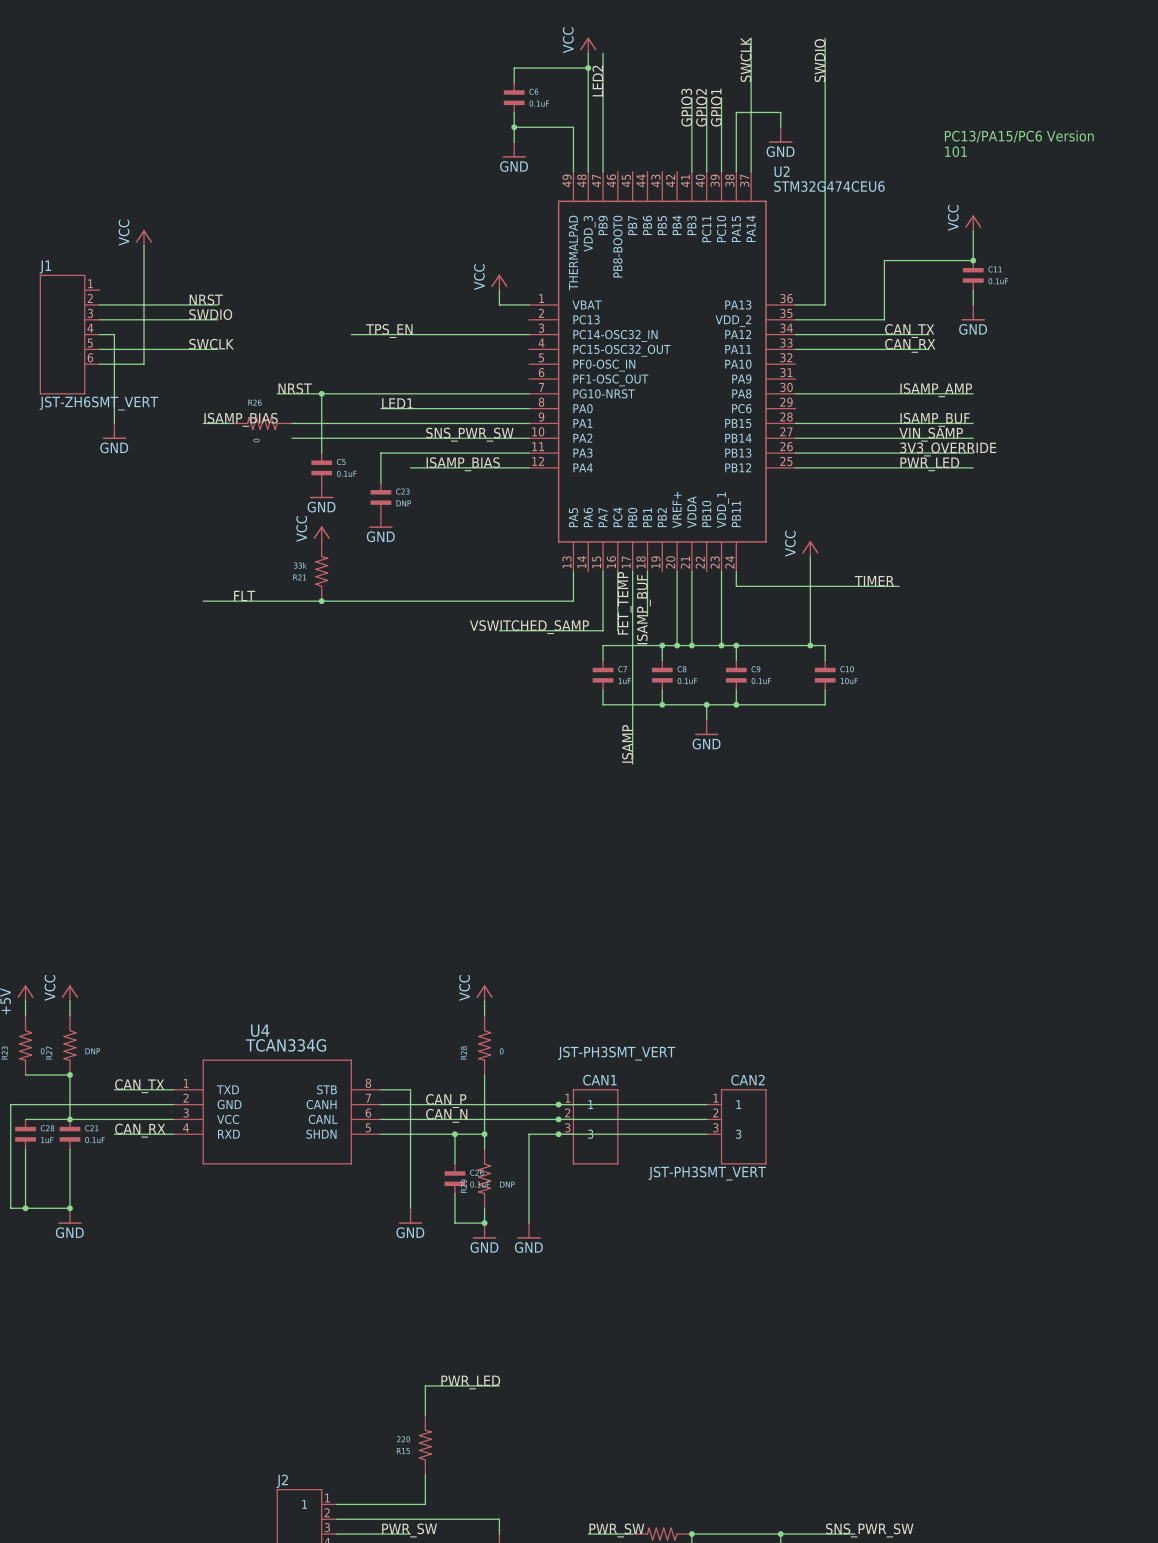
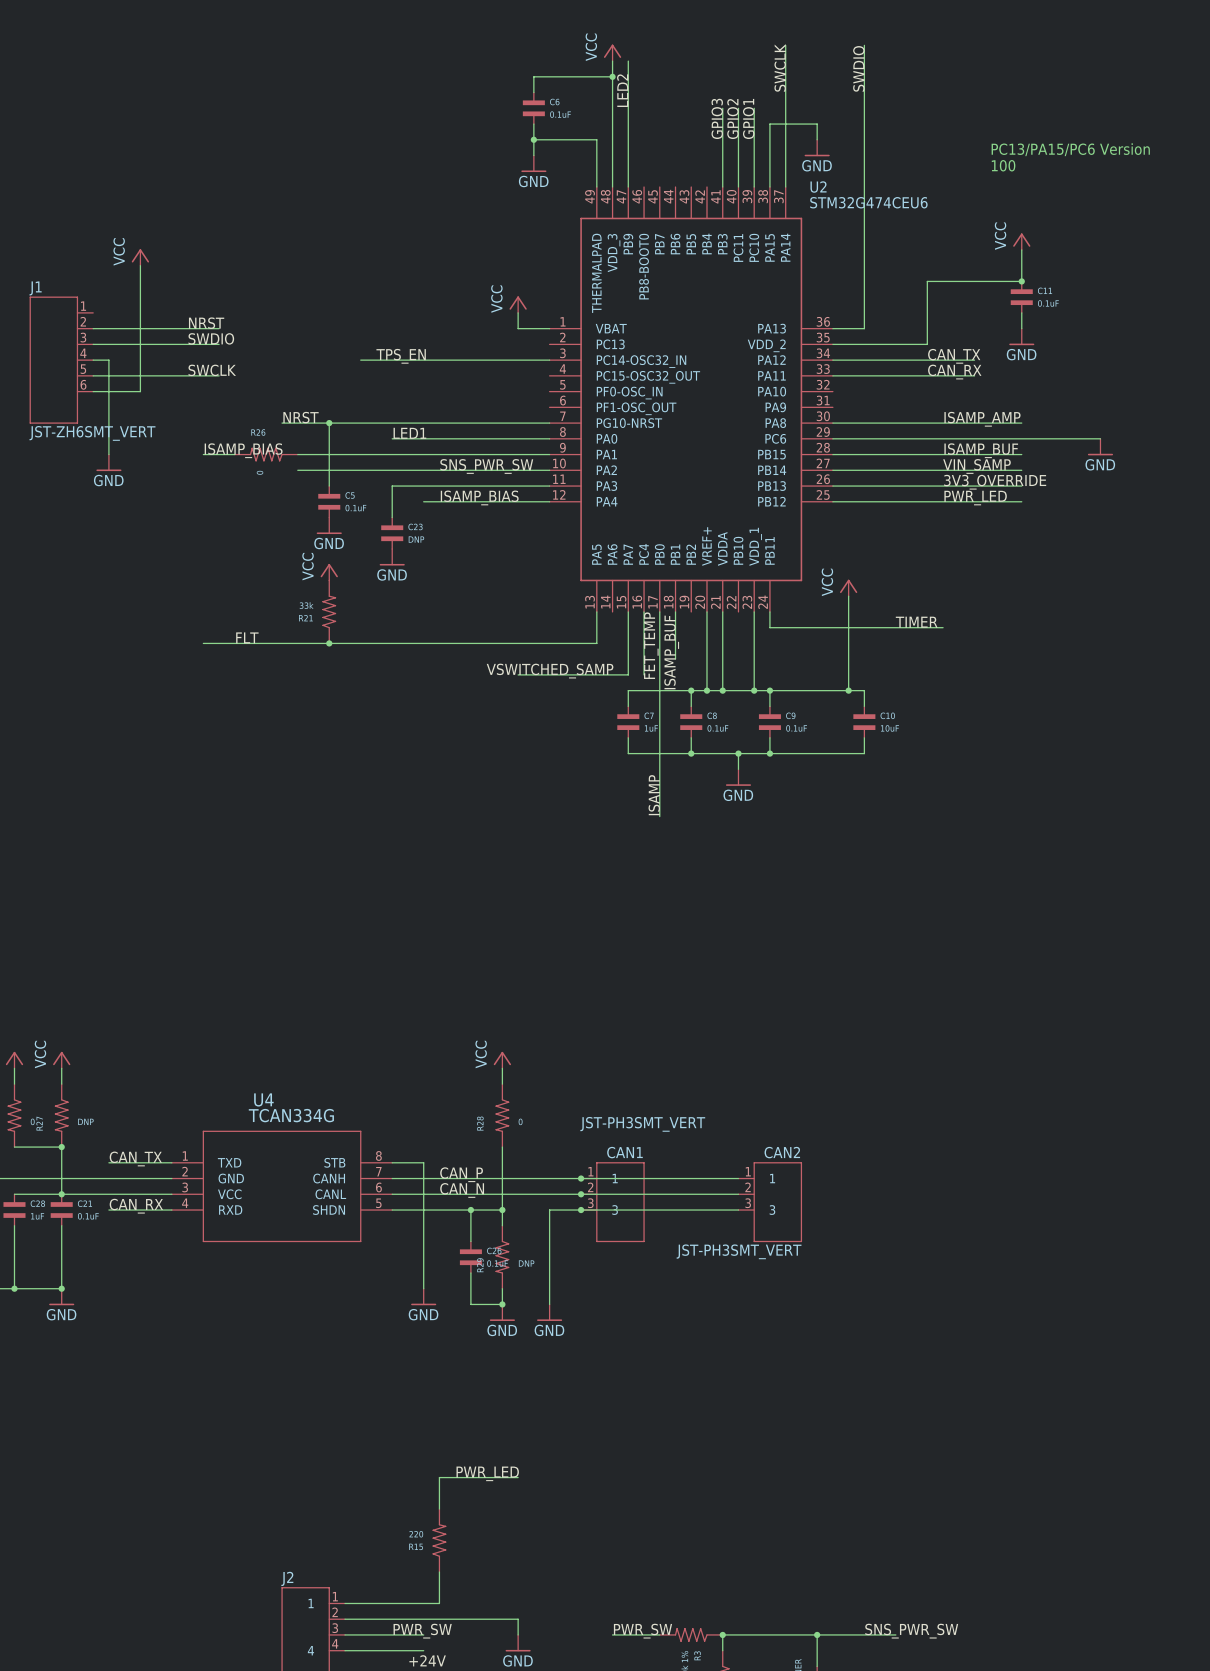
text: 101 (955, 151) -> 100 (1003, 165)
wire: none -> (832, 438) (1100, 438)
power symbol: none -> GND (1100, 447)

